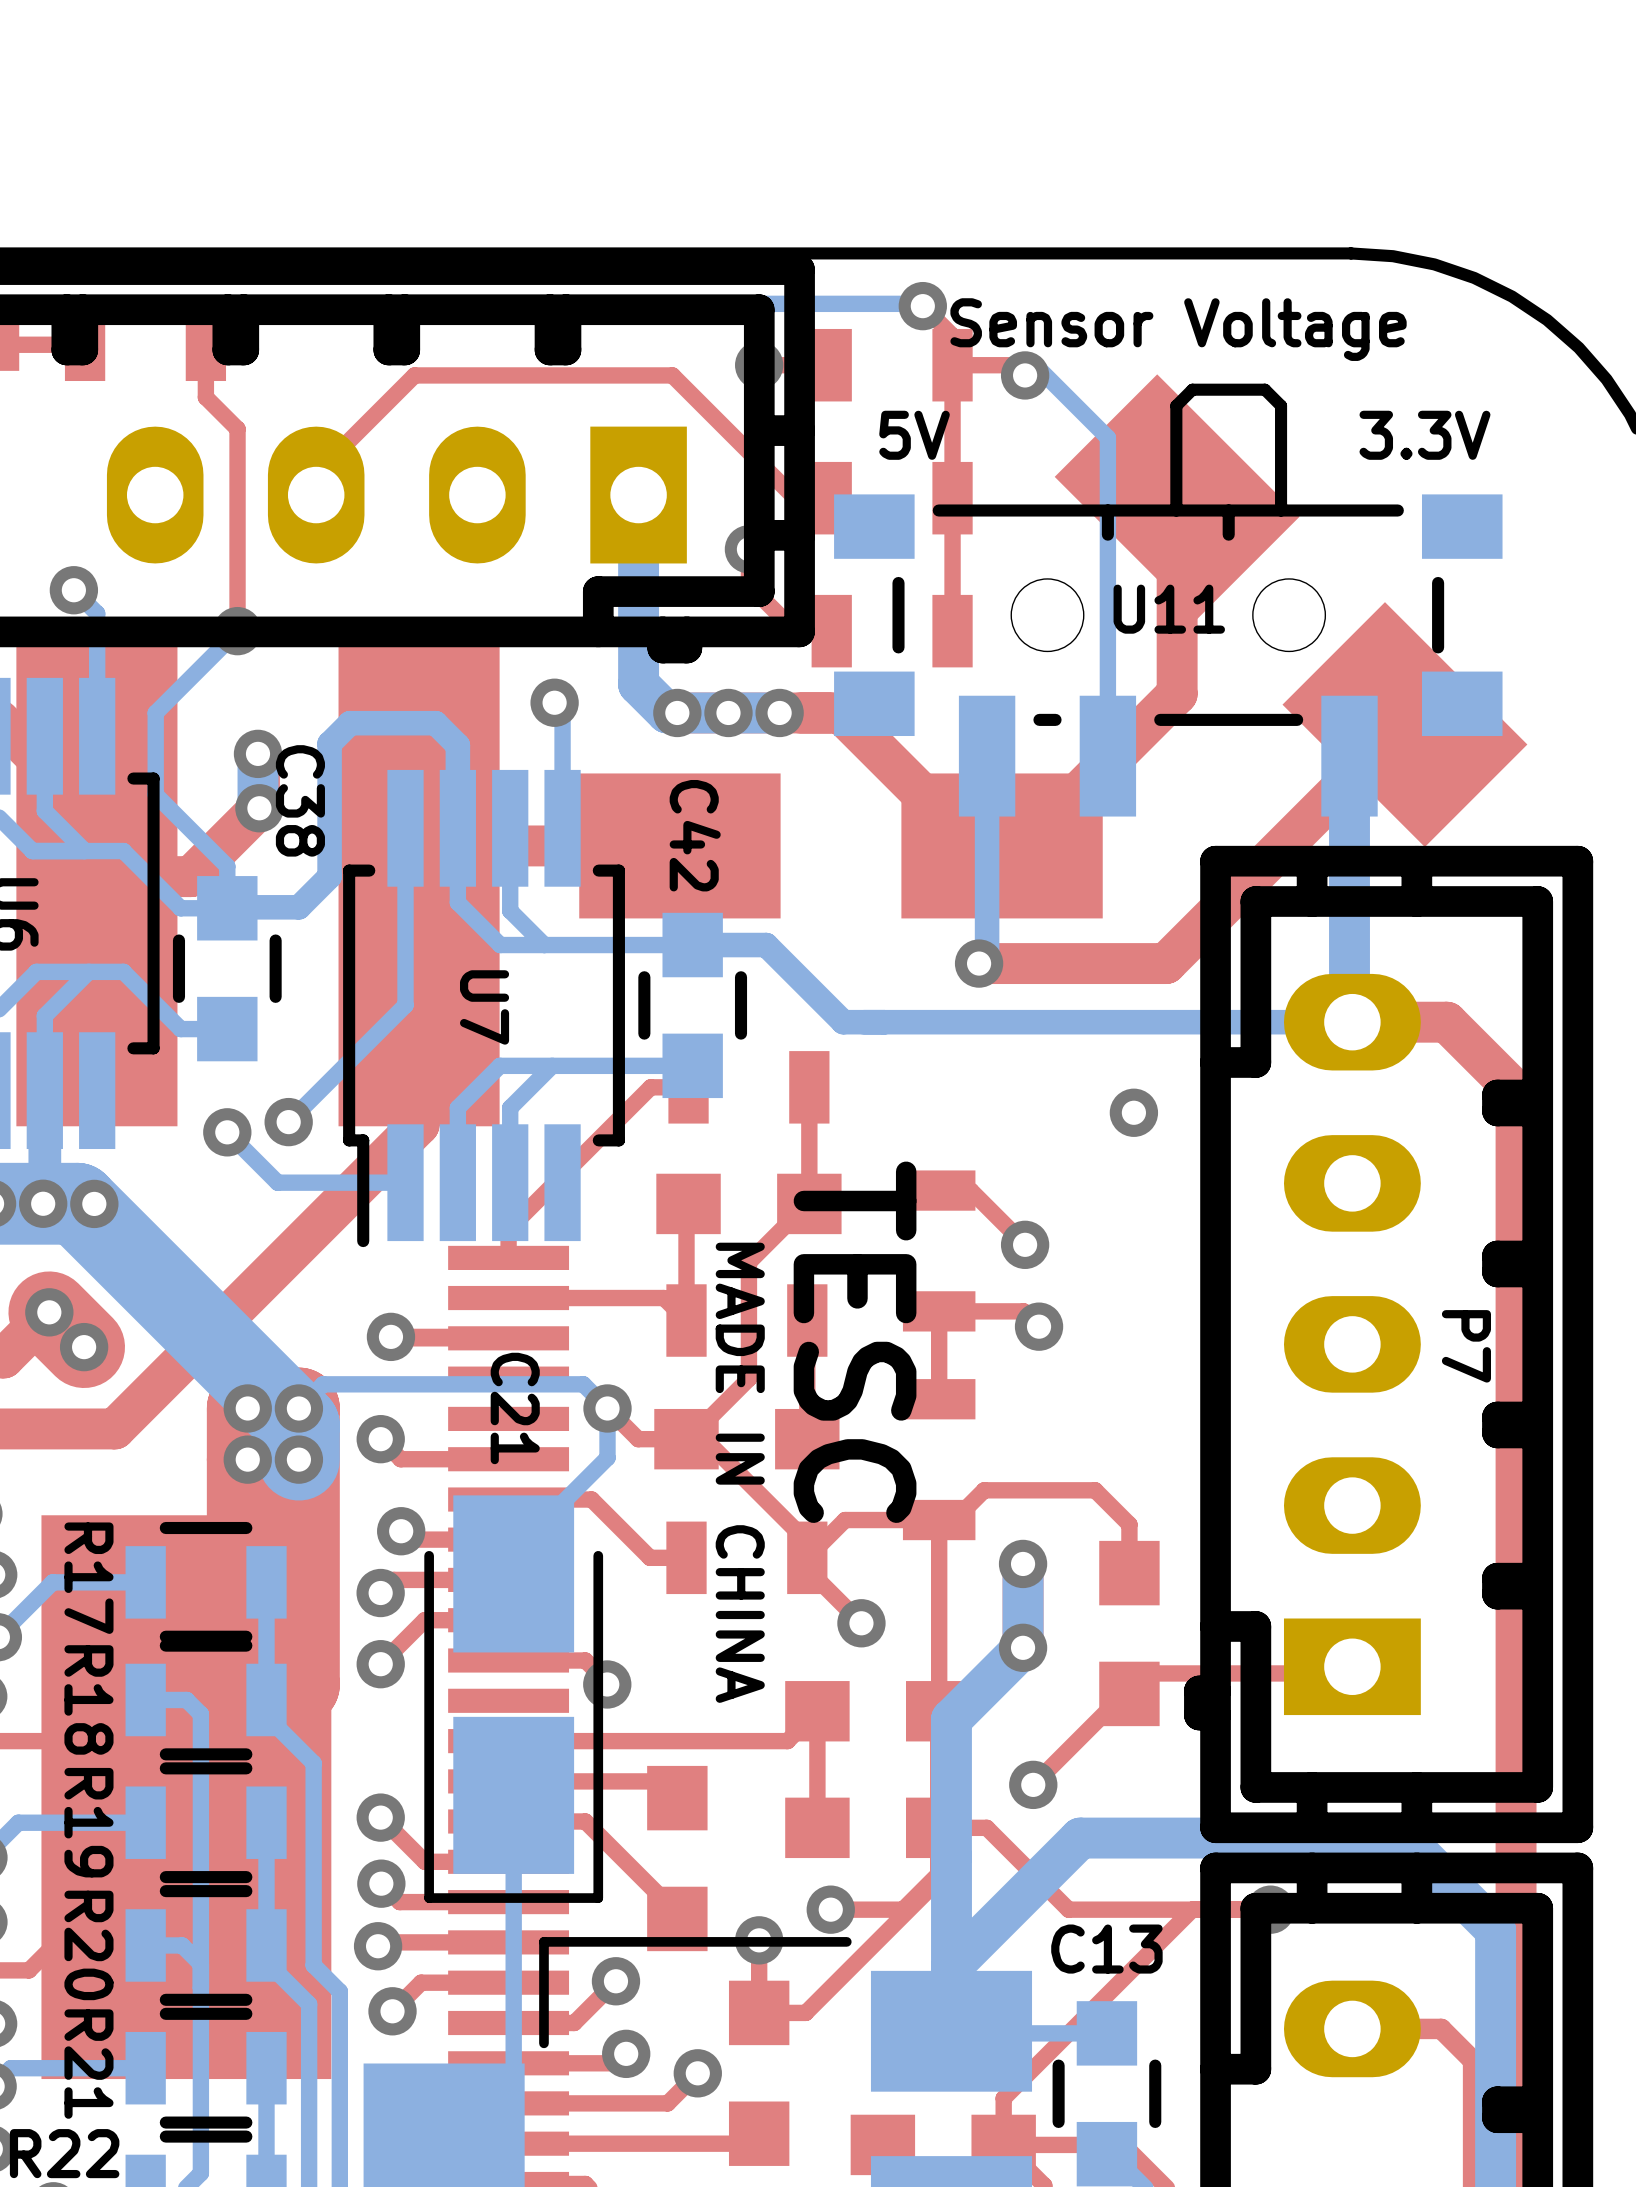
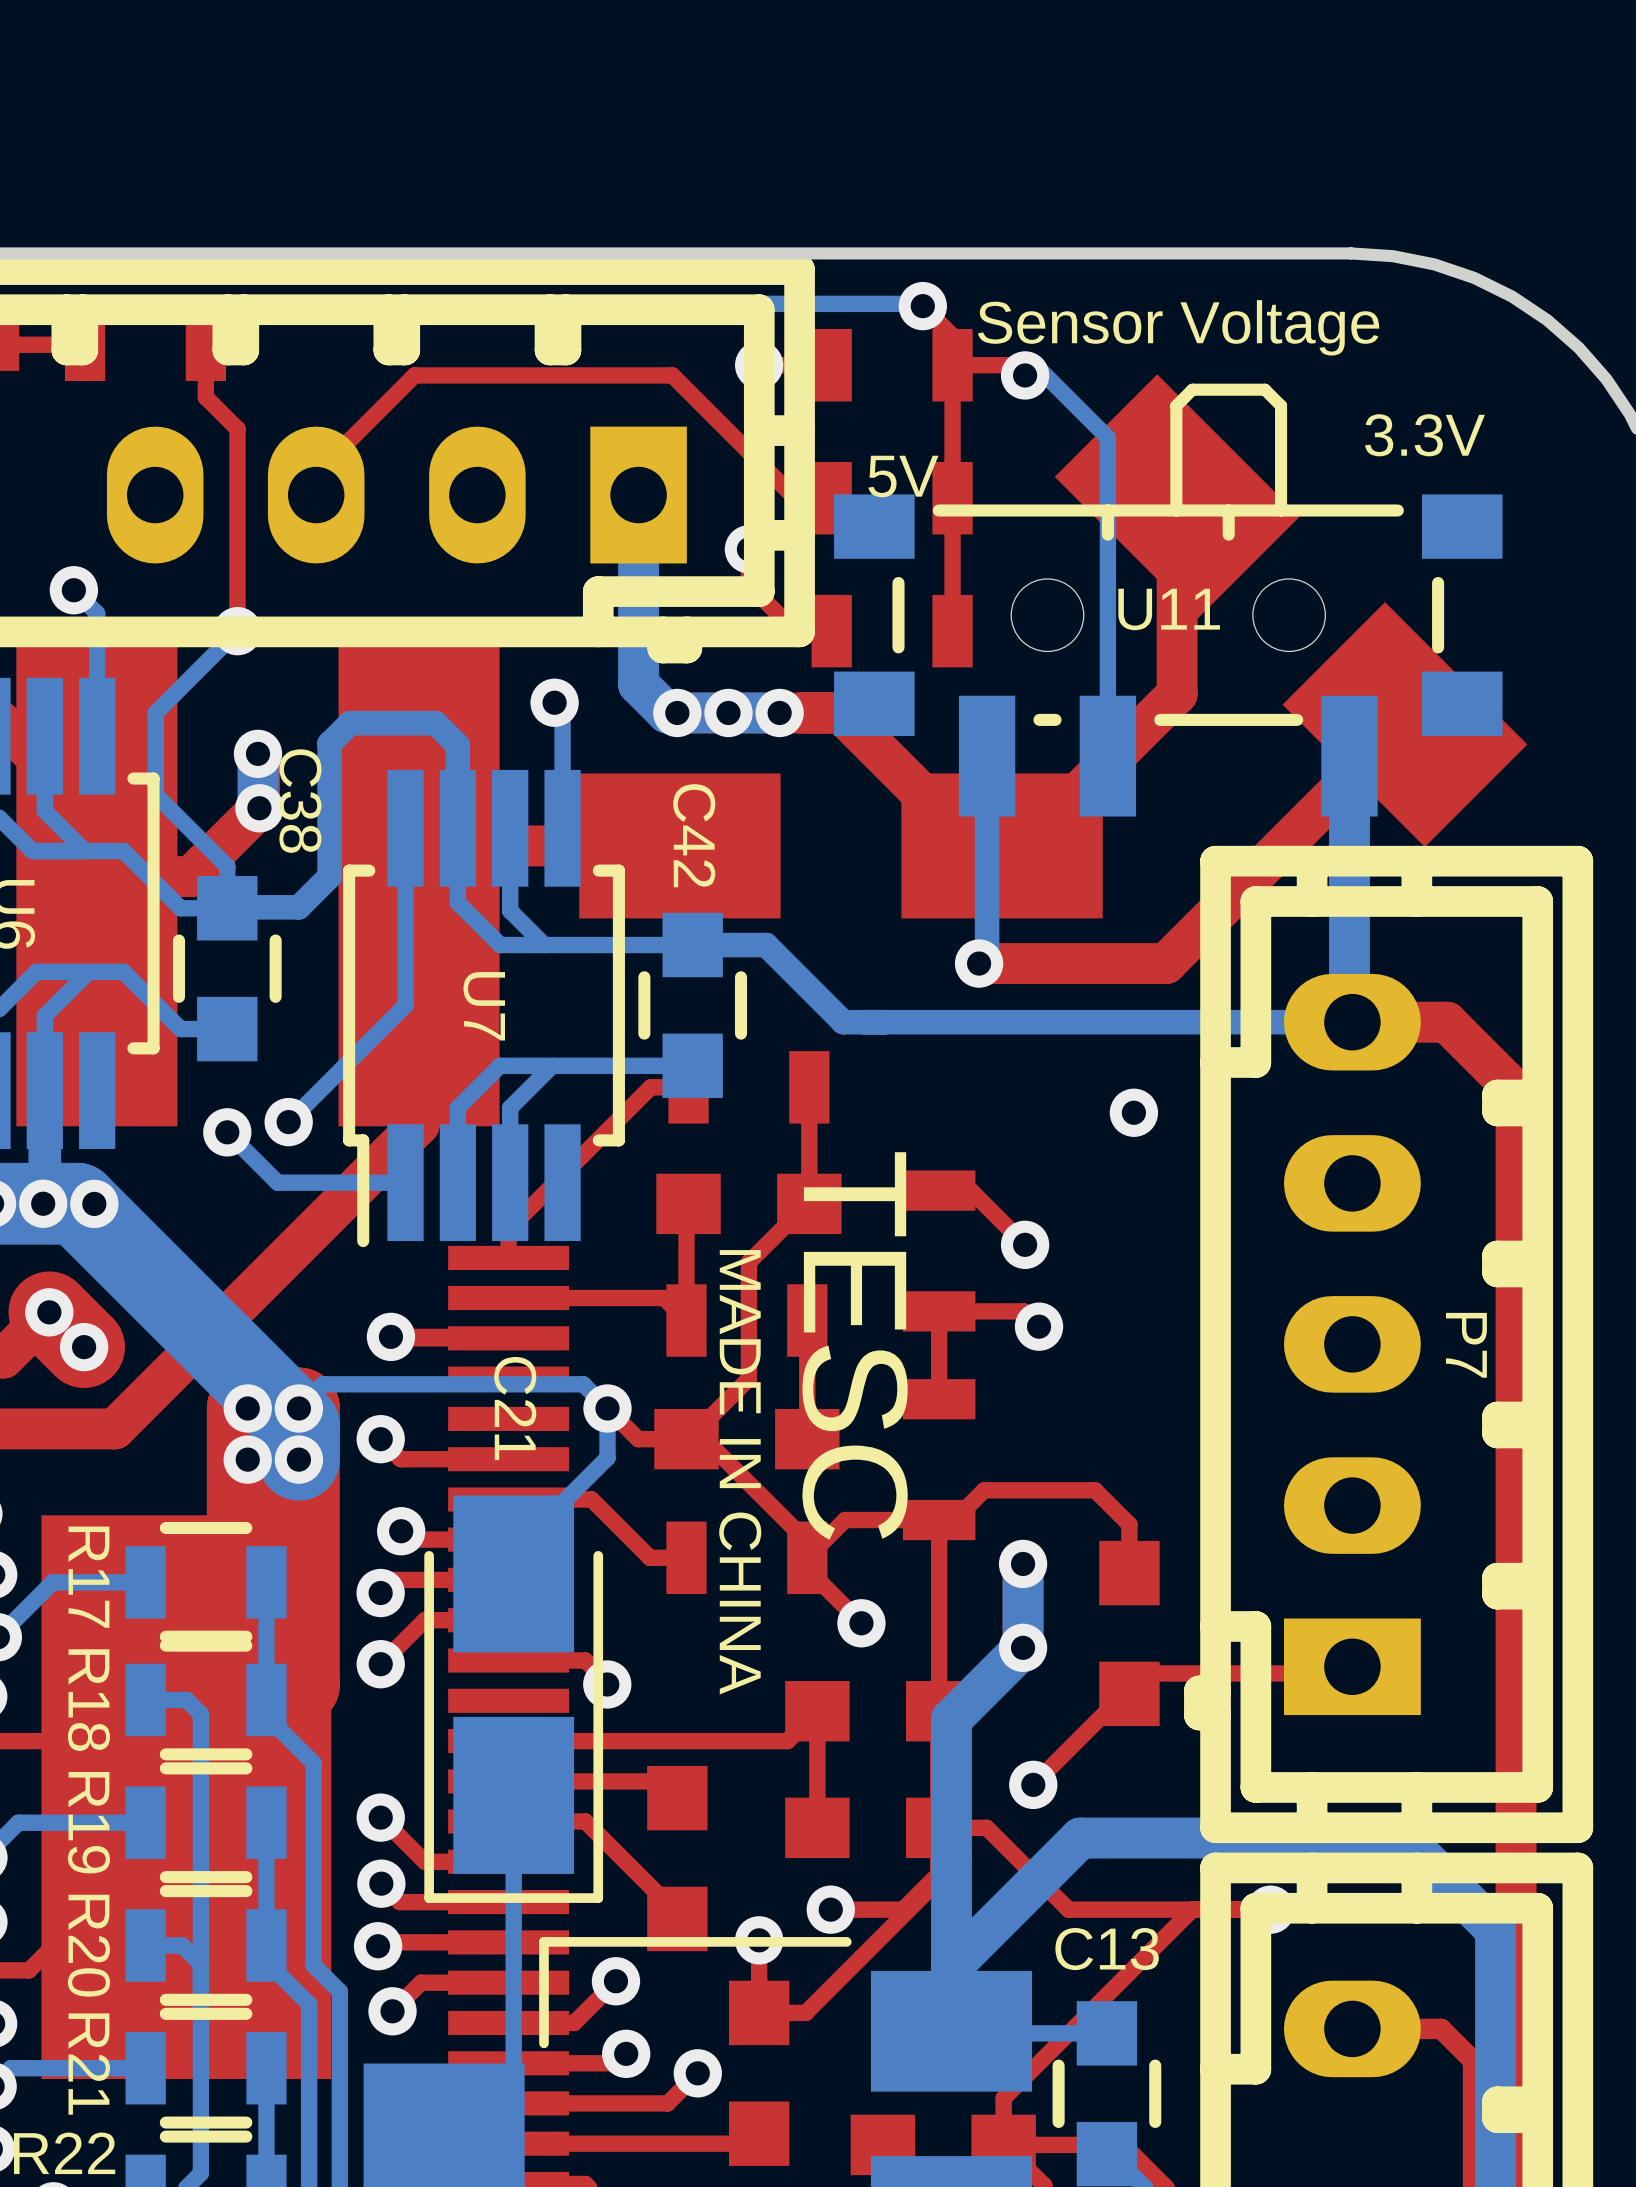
text position: 5V (914, 435) -> 5V (903, 476)

